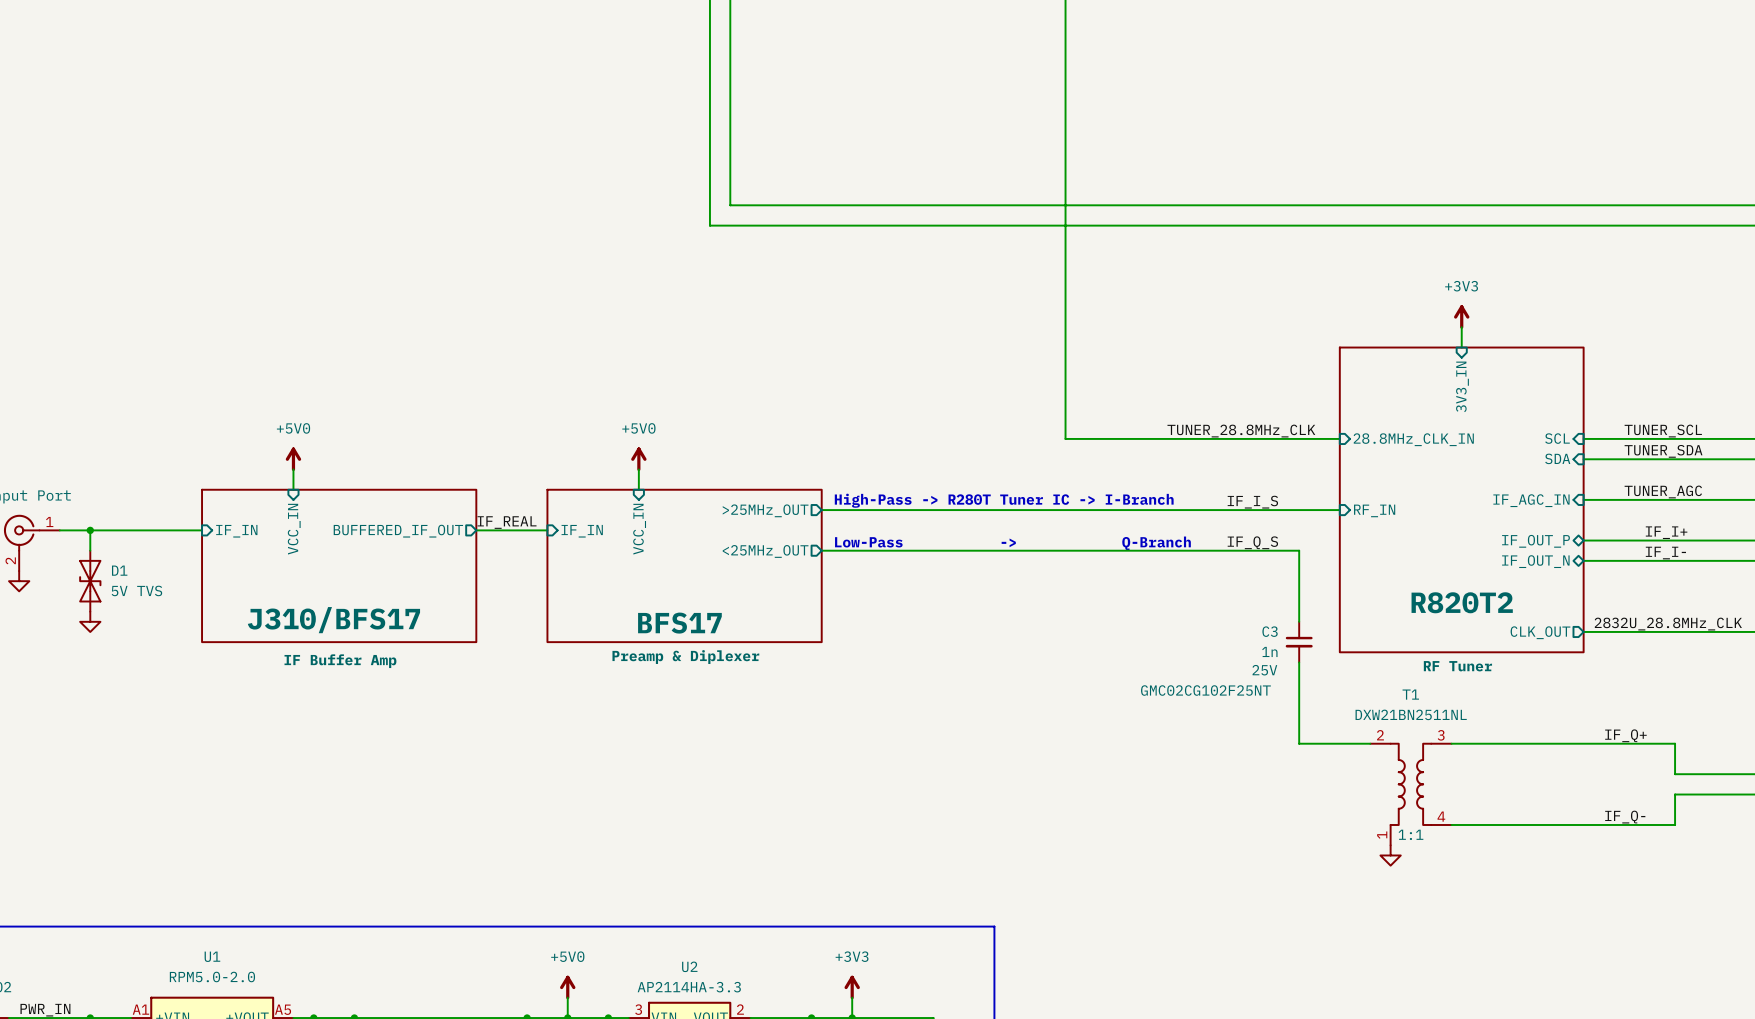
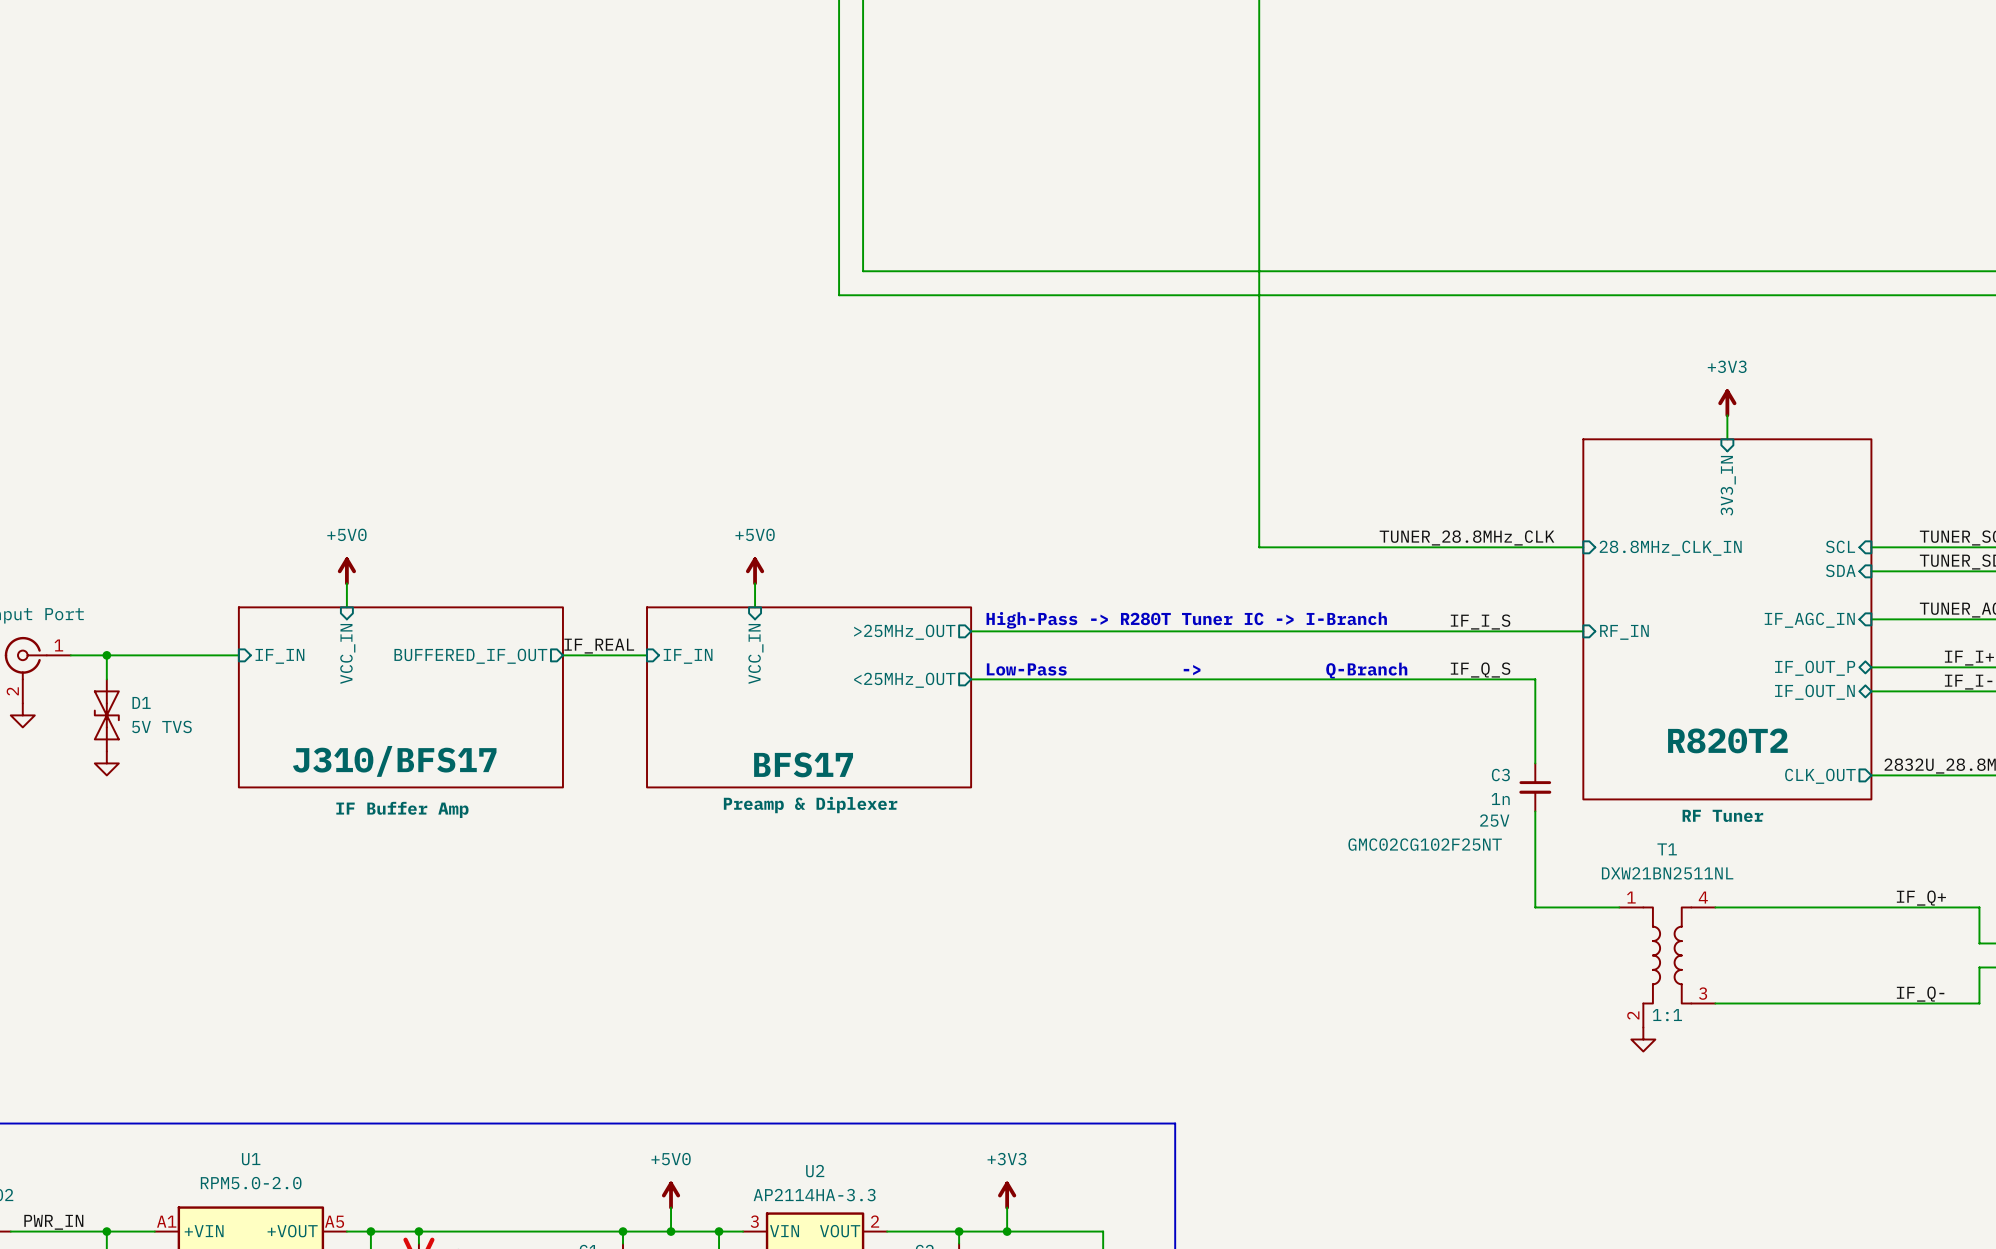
T1 pin number: 2 (1380, 735) -> 1 (1631, 897)
T1 pin number: 3 (1441, 735) -> 4 (1703, 897)
T1 pin number: 4 (1441, 816) -> 3 (1703, 993)
T1 pin number: 1 (1382, 835) -> 2 (1633, 1015)

